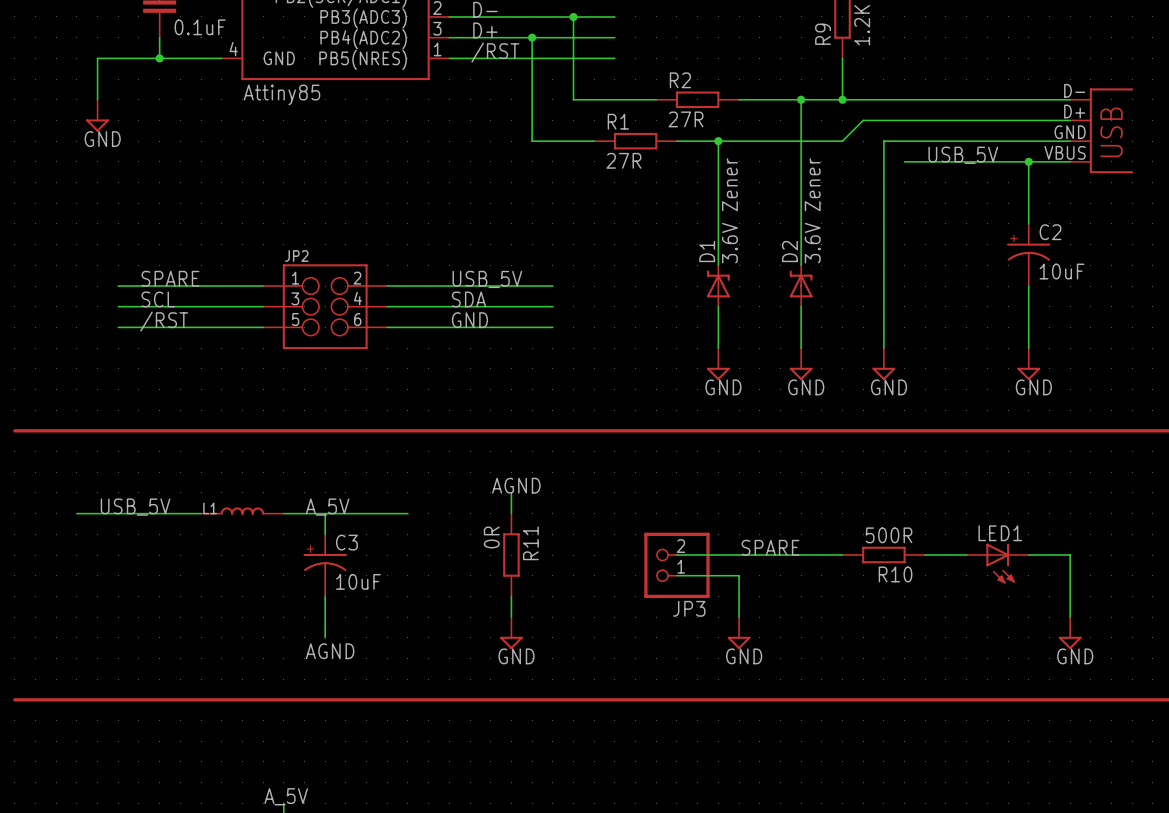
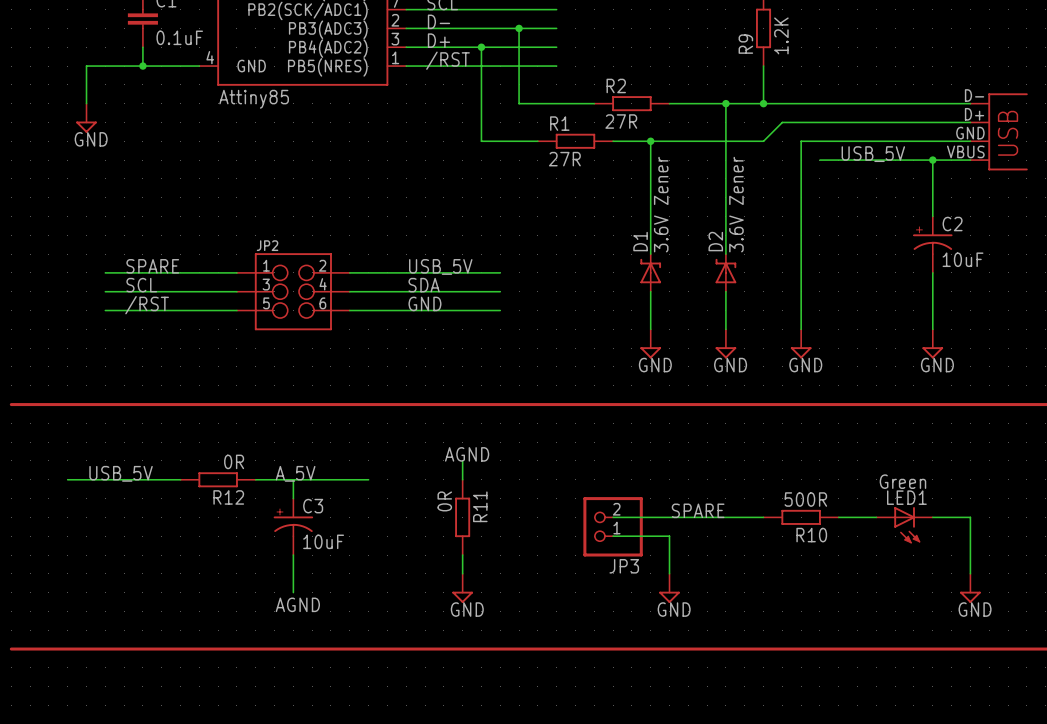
L1: (242, 511) -> none
R12: none -> 0R (218, 479)
LED1 value: none -> Green (902, 481)

